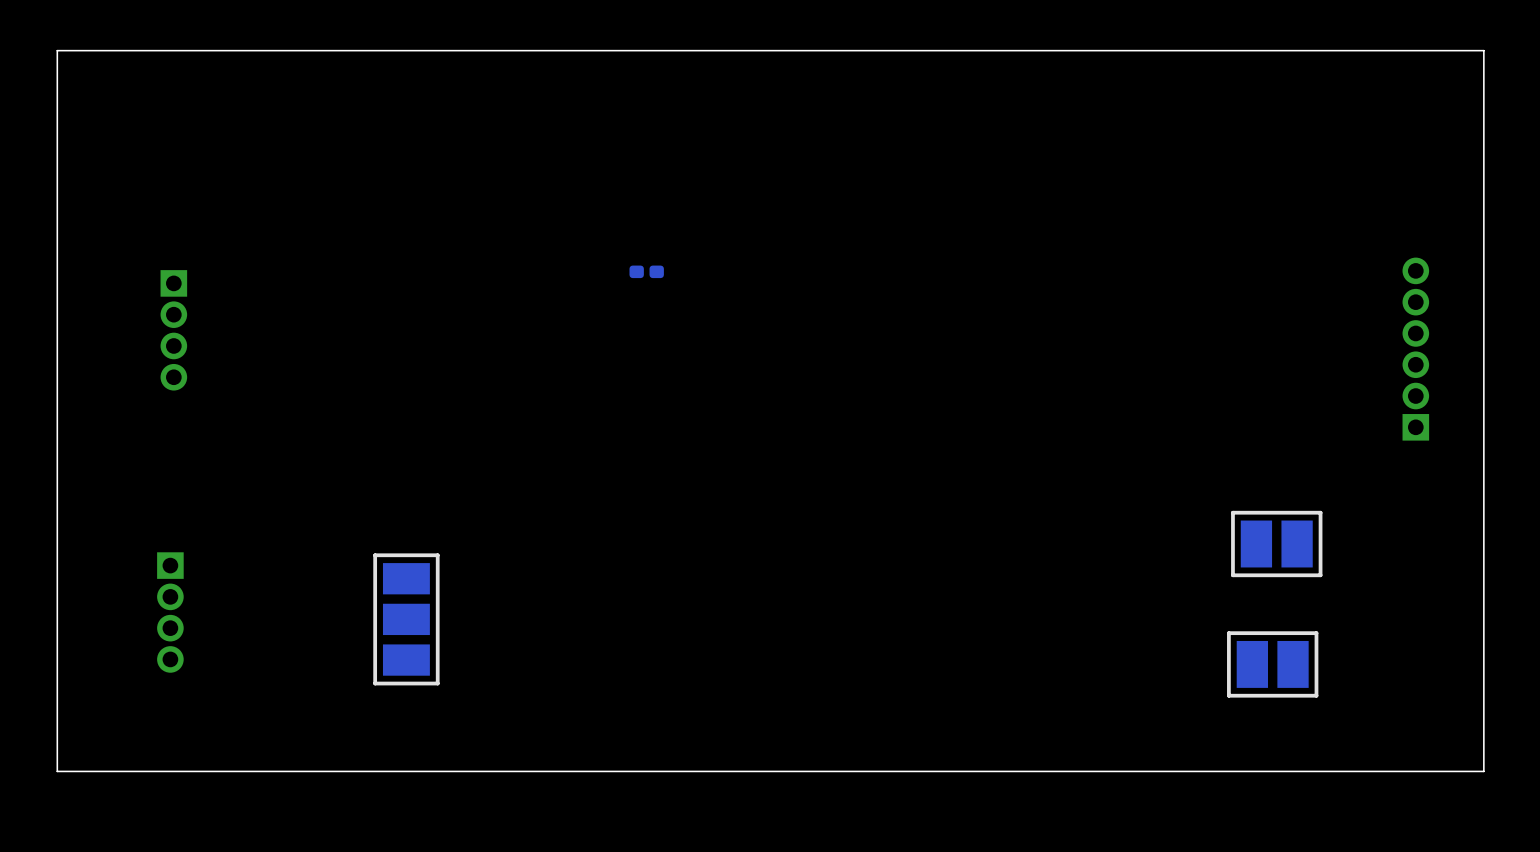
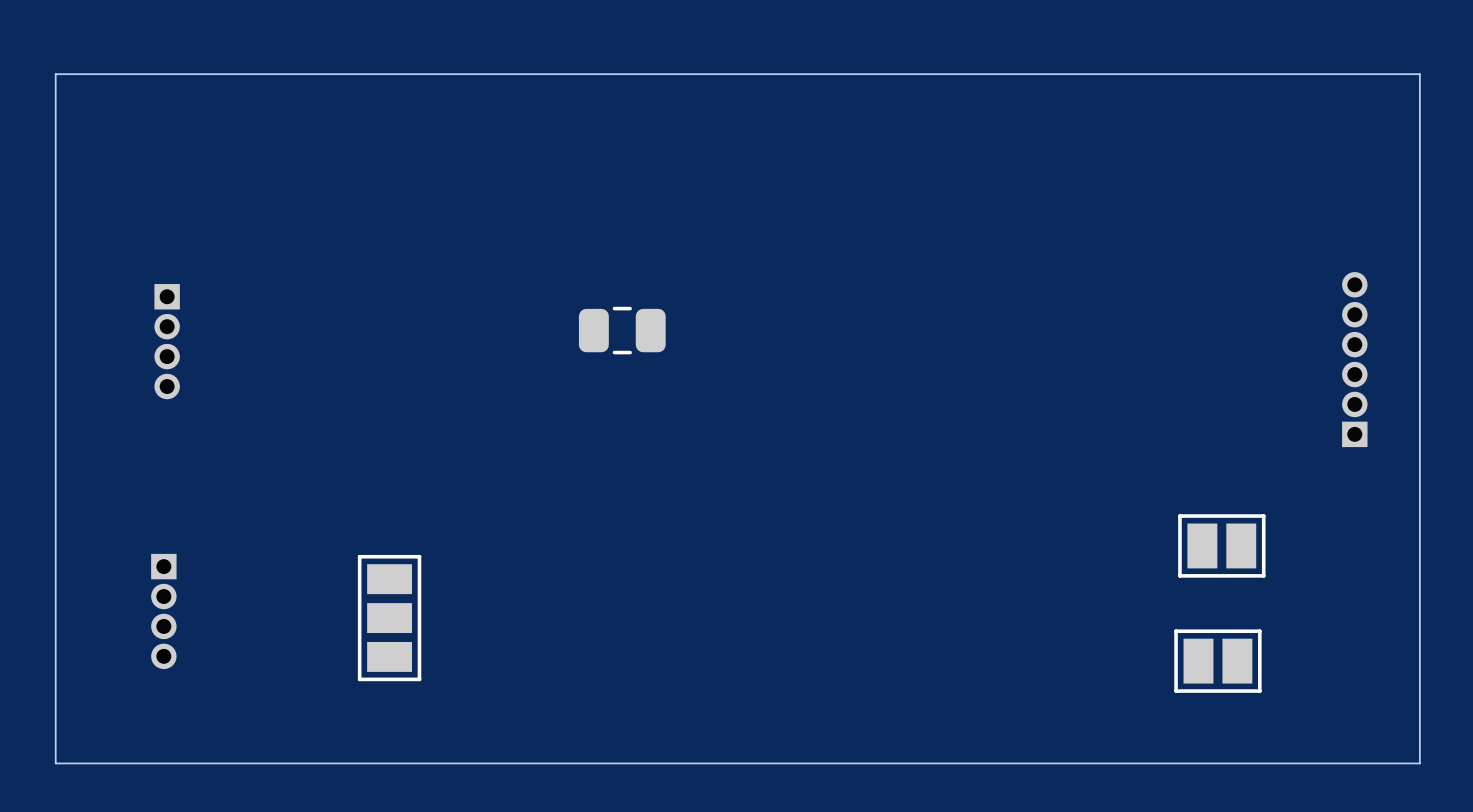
part: (646, 271) -> none
part: none -> (622, 330)

